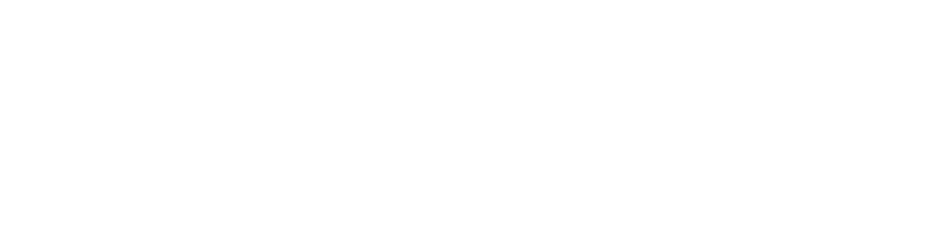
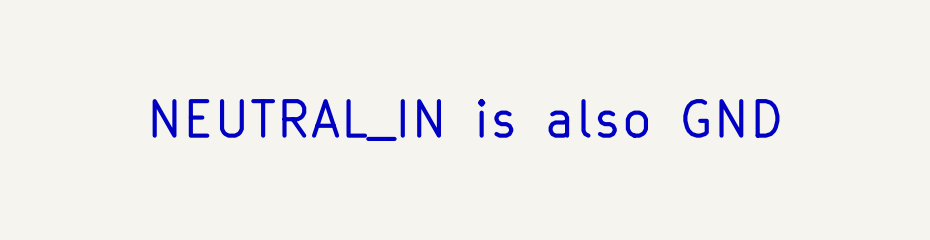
text: none -> NEUTRAL_IN is also GND (466, 120)

